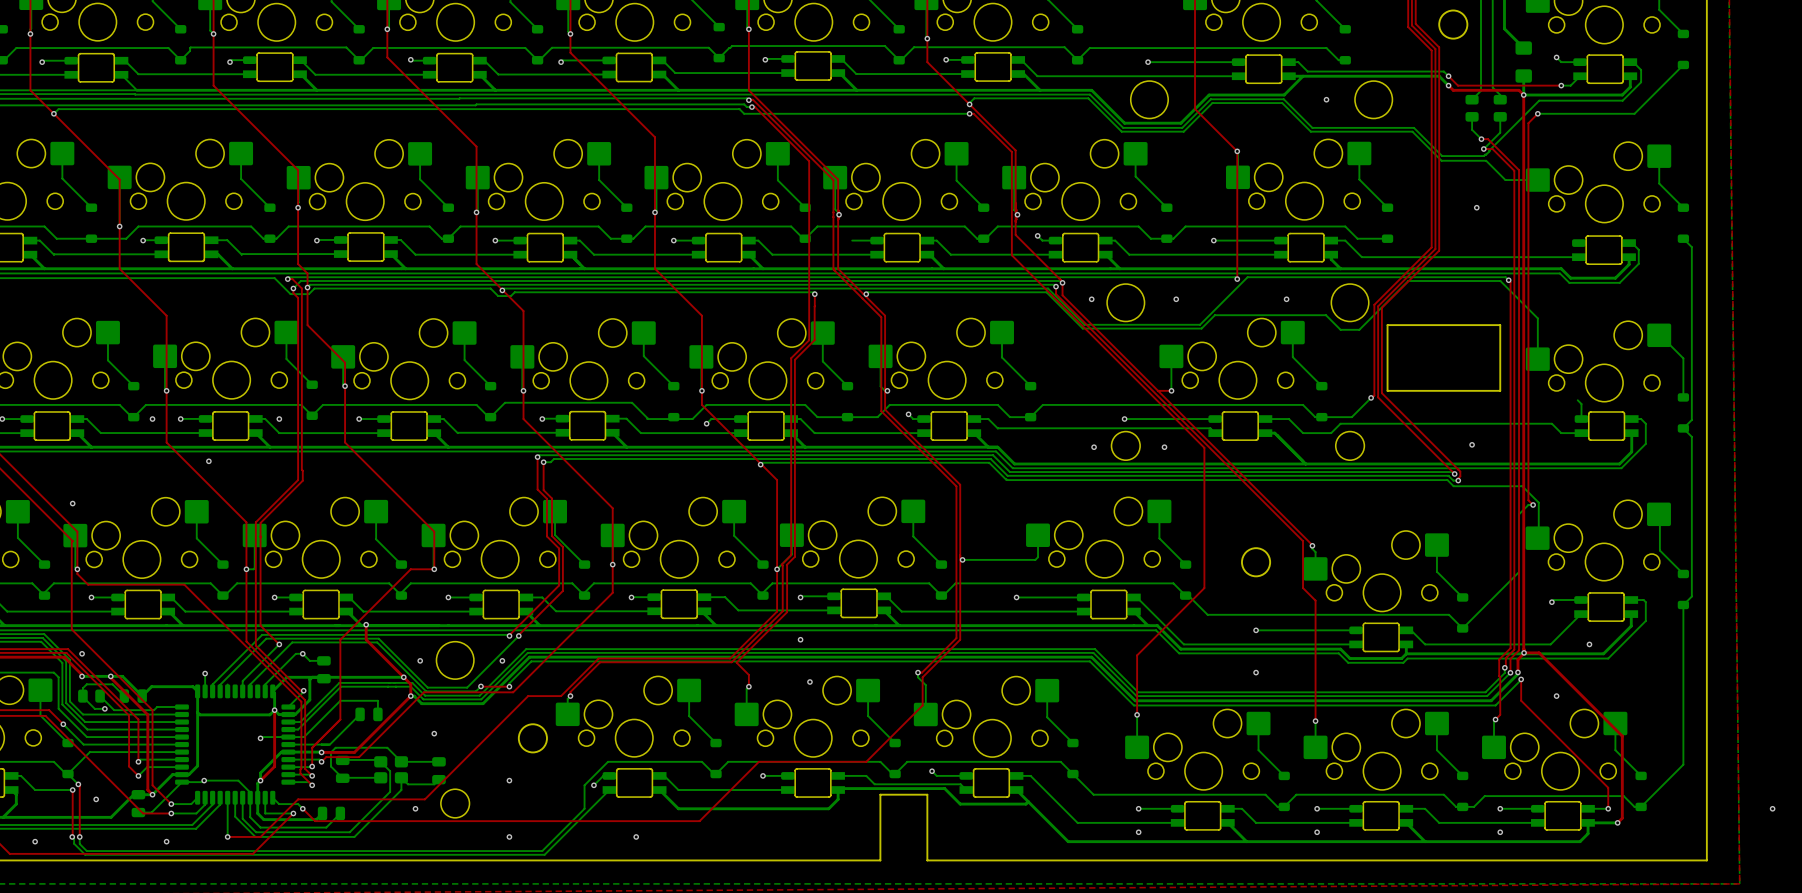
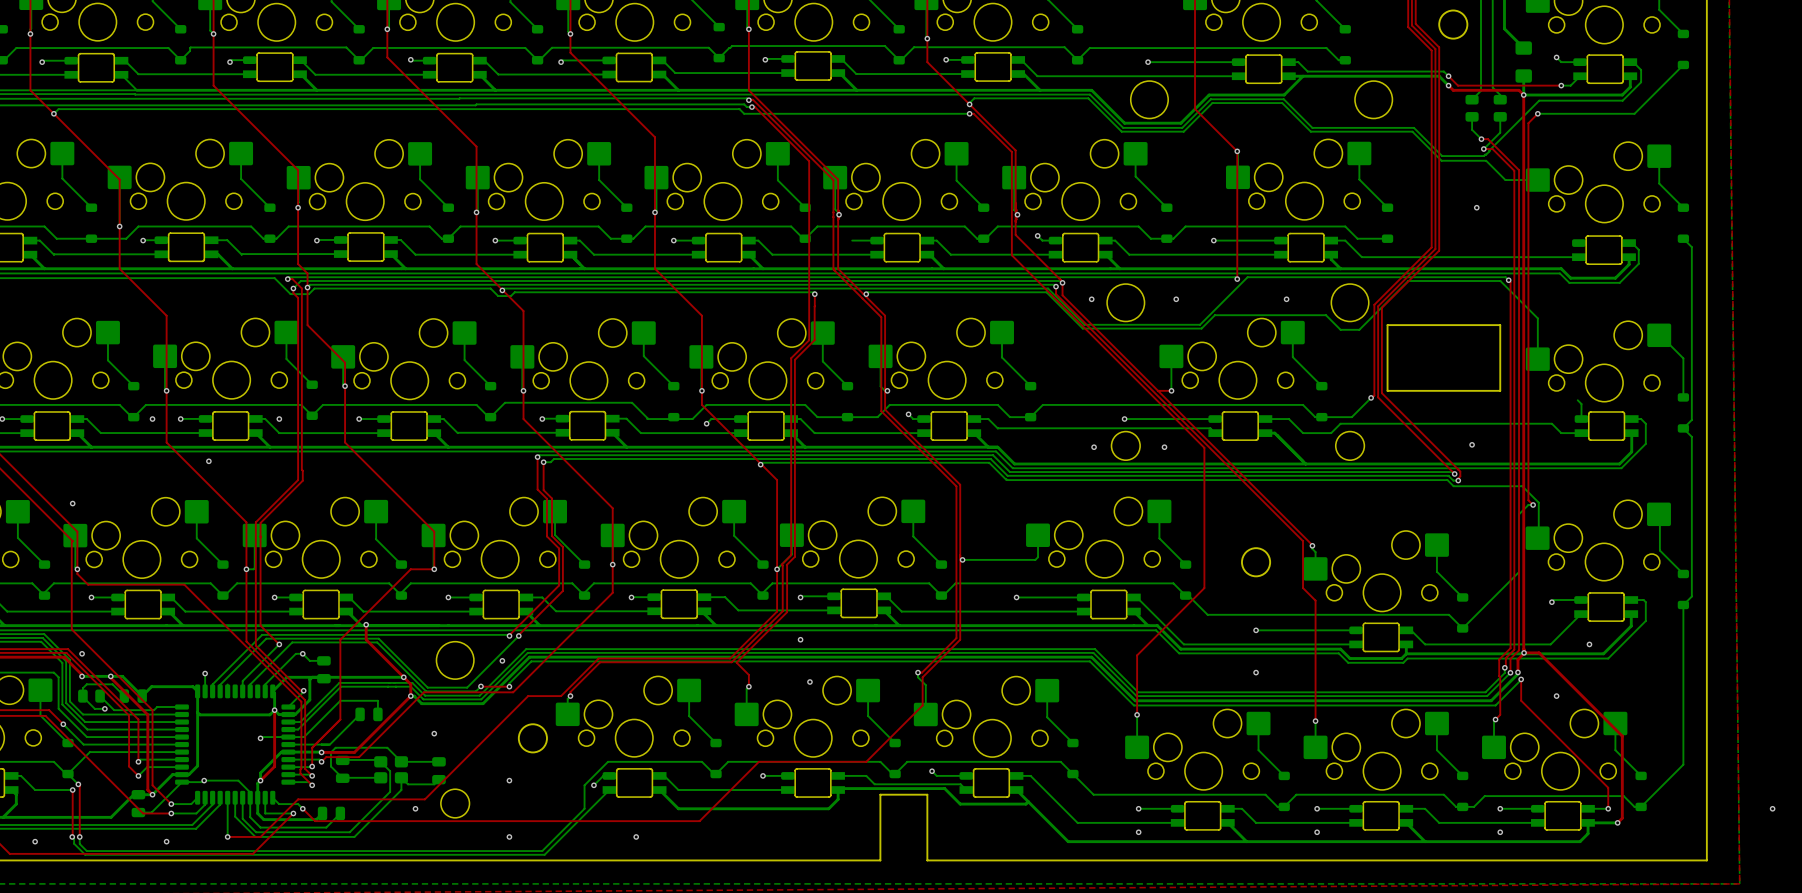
via: (1326, 99) -> none
via: (420, 660) -> none
via: (96, 799) -> none

